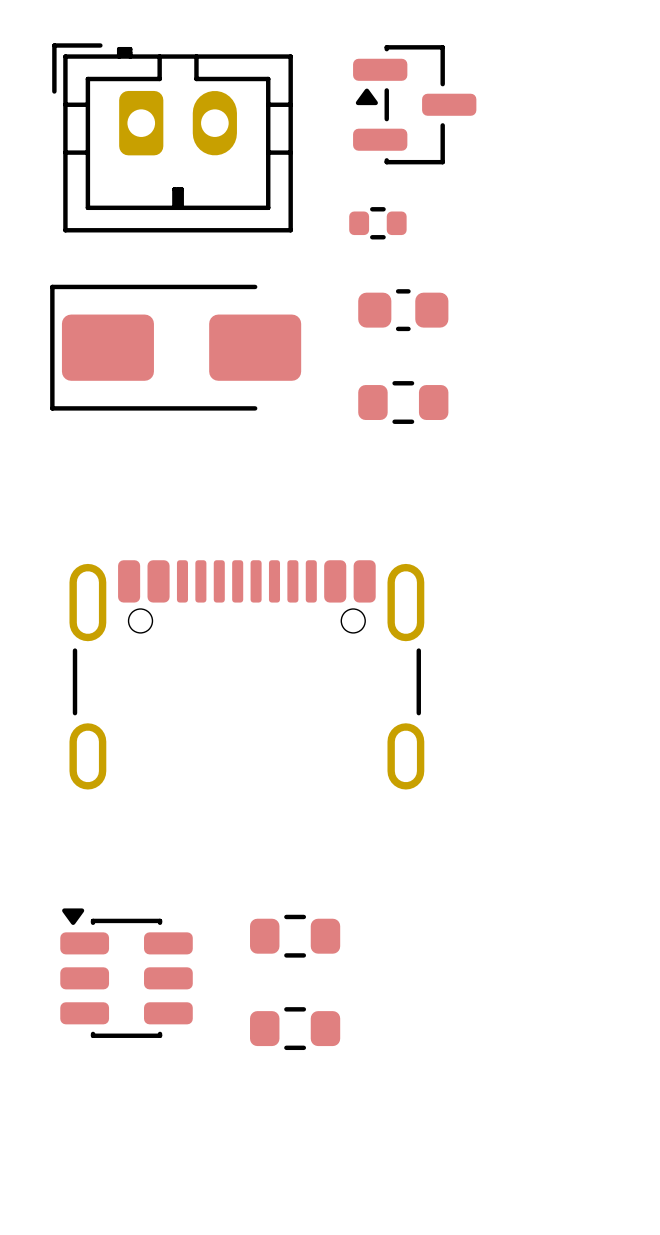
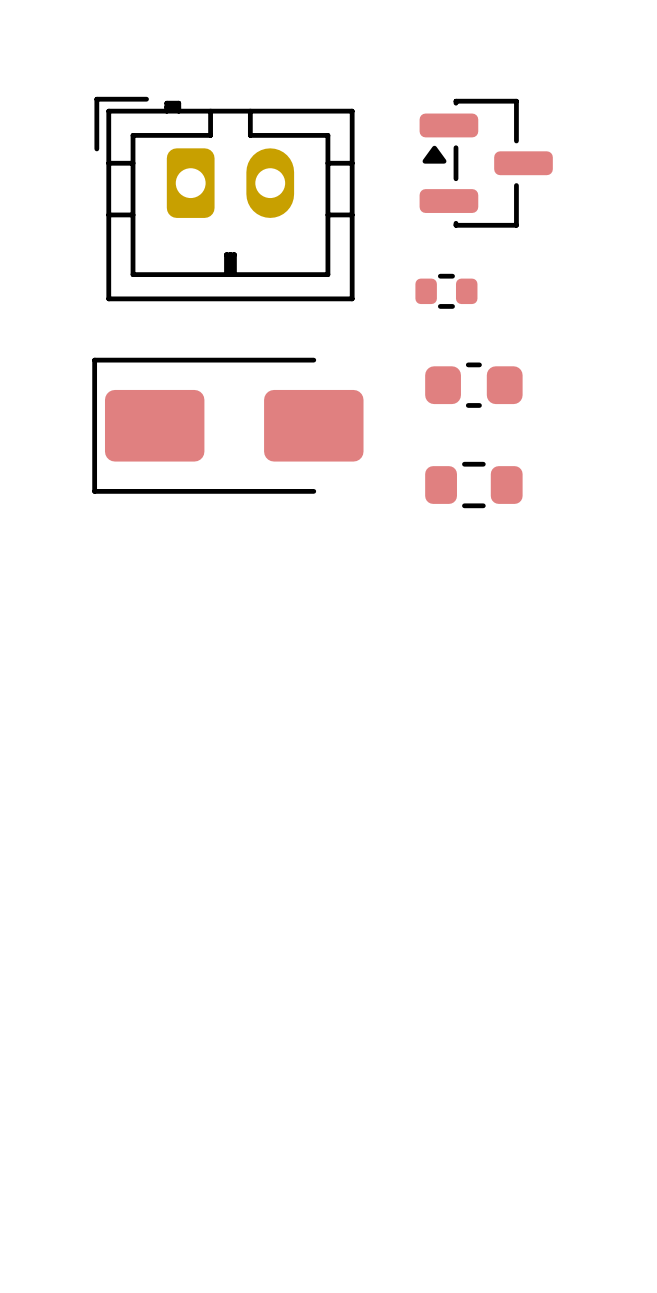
part: (246, 674) -> none
part: (295, 936) -> none
part: (126, 973) -> none
part: (295, 1028) -> none

